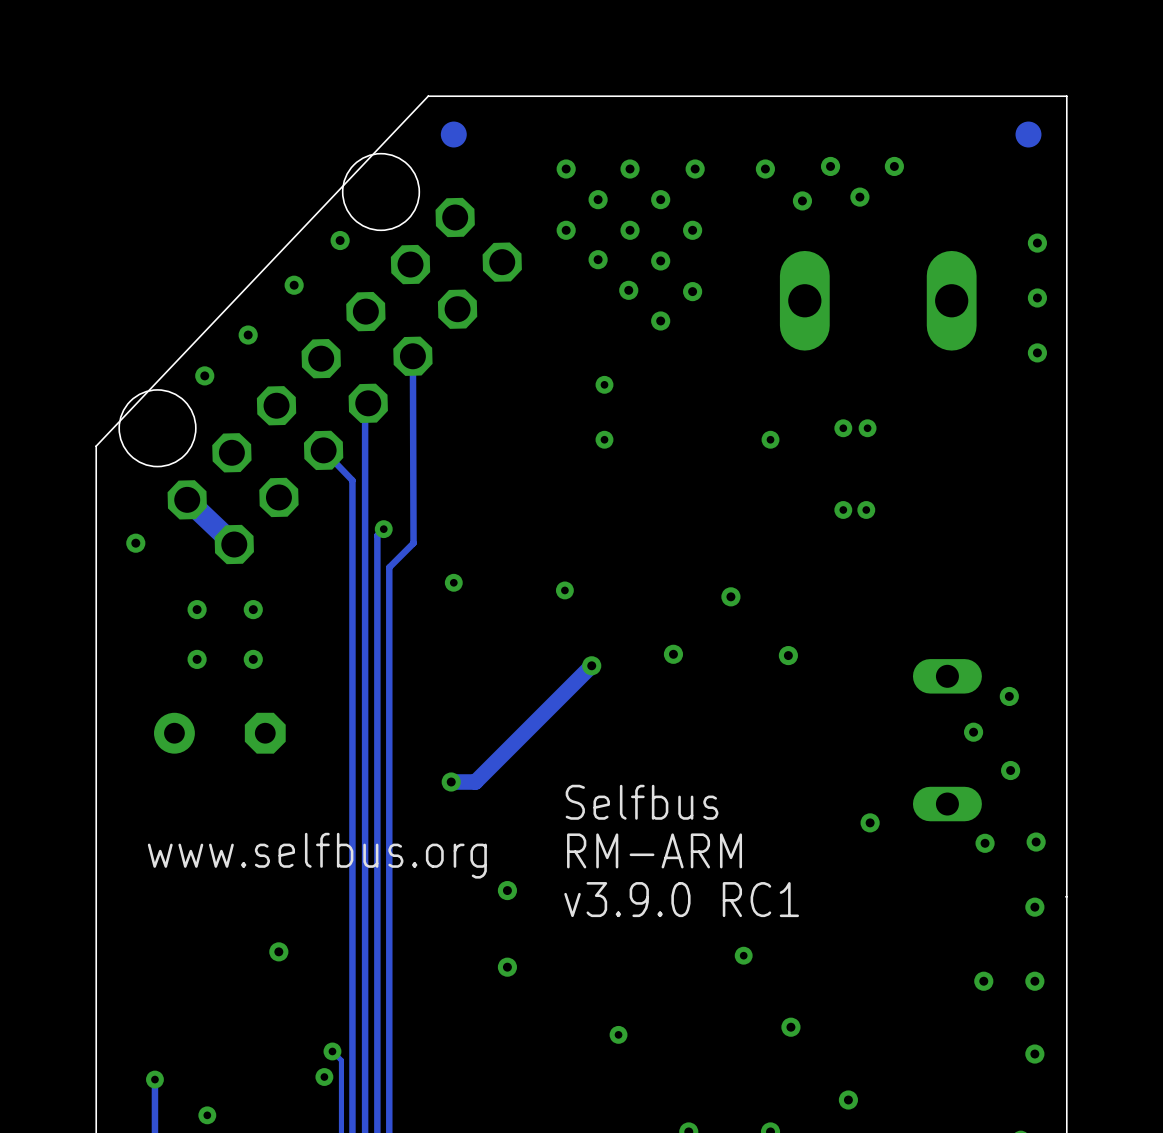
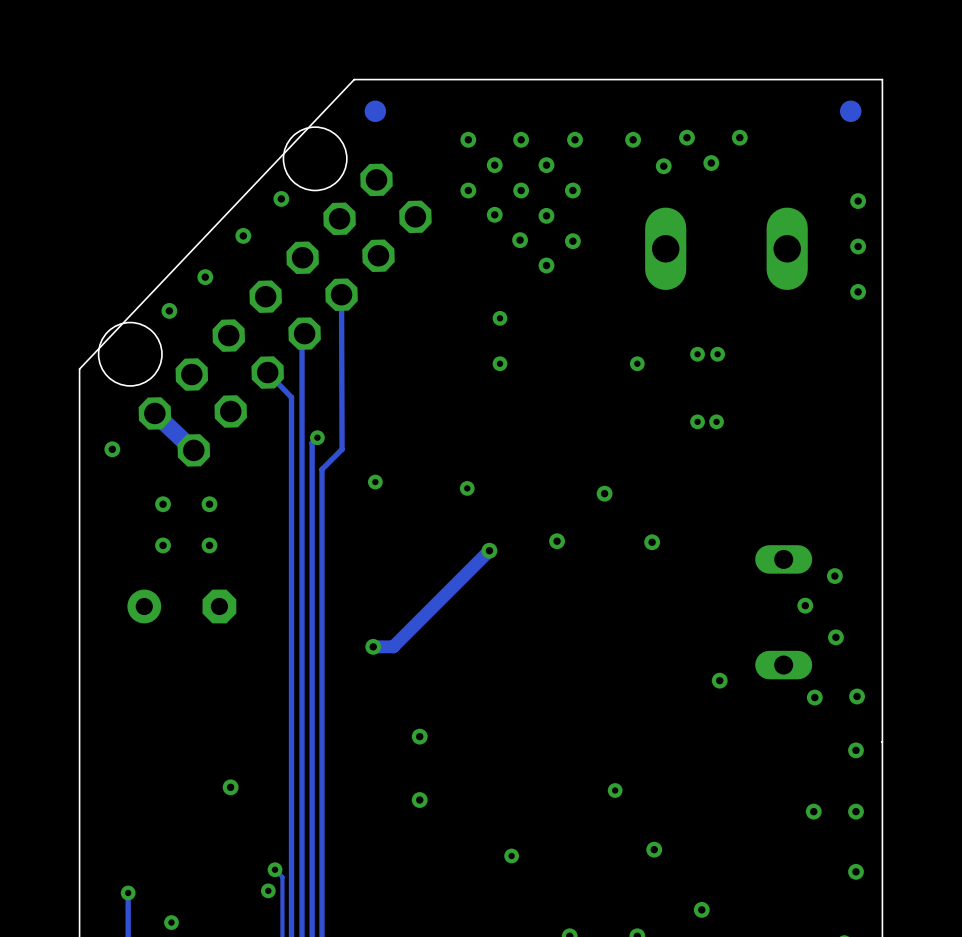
text: Selfbus (642, 802) -> none
text: RM-ARM (654, 850) -> none
text: www.selfbus.org (317, 855) -> none
text: v3.9.0 RC1 (681, 899) -> none

